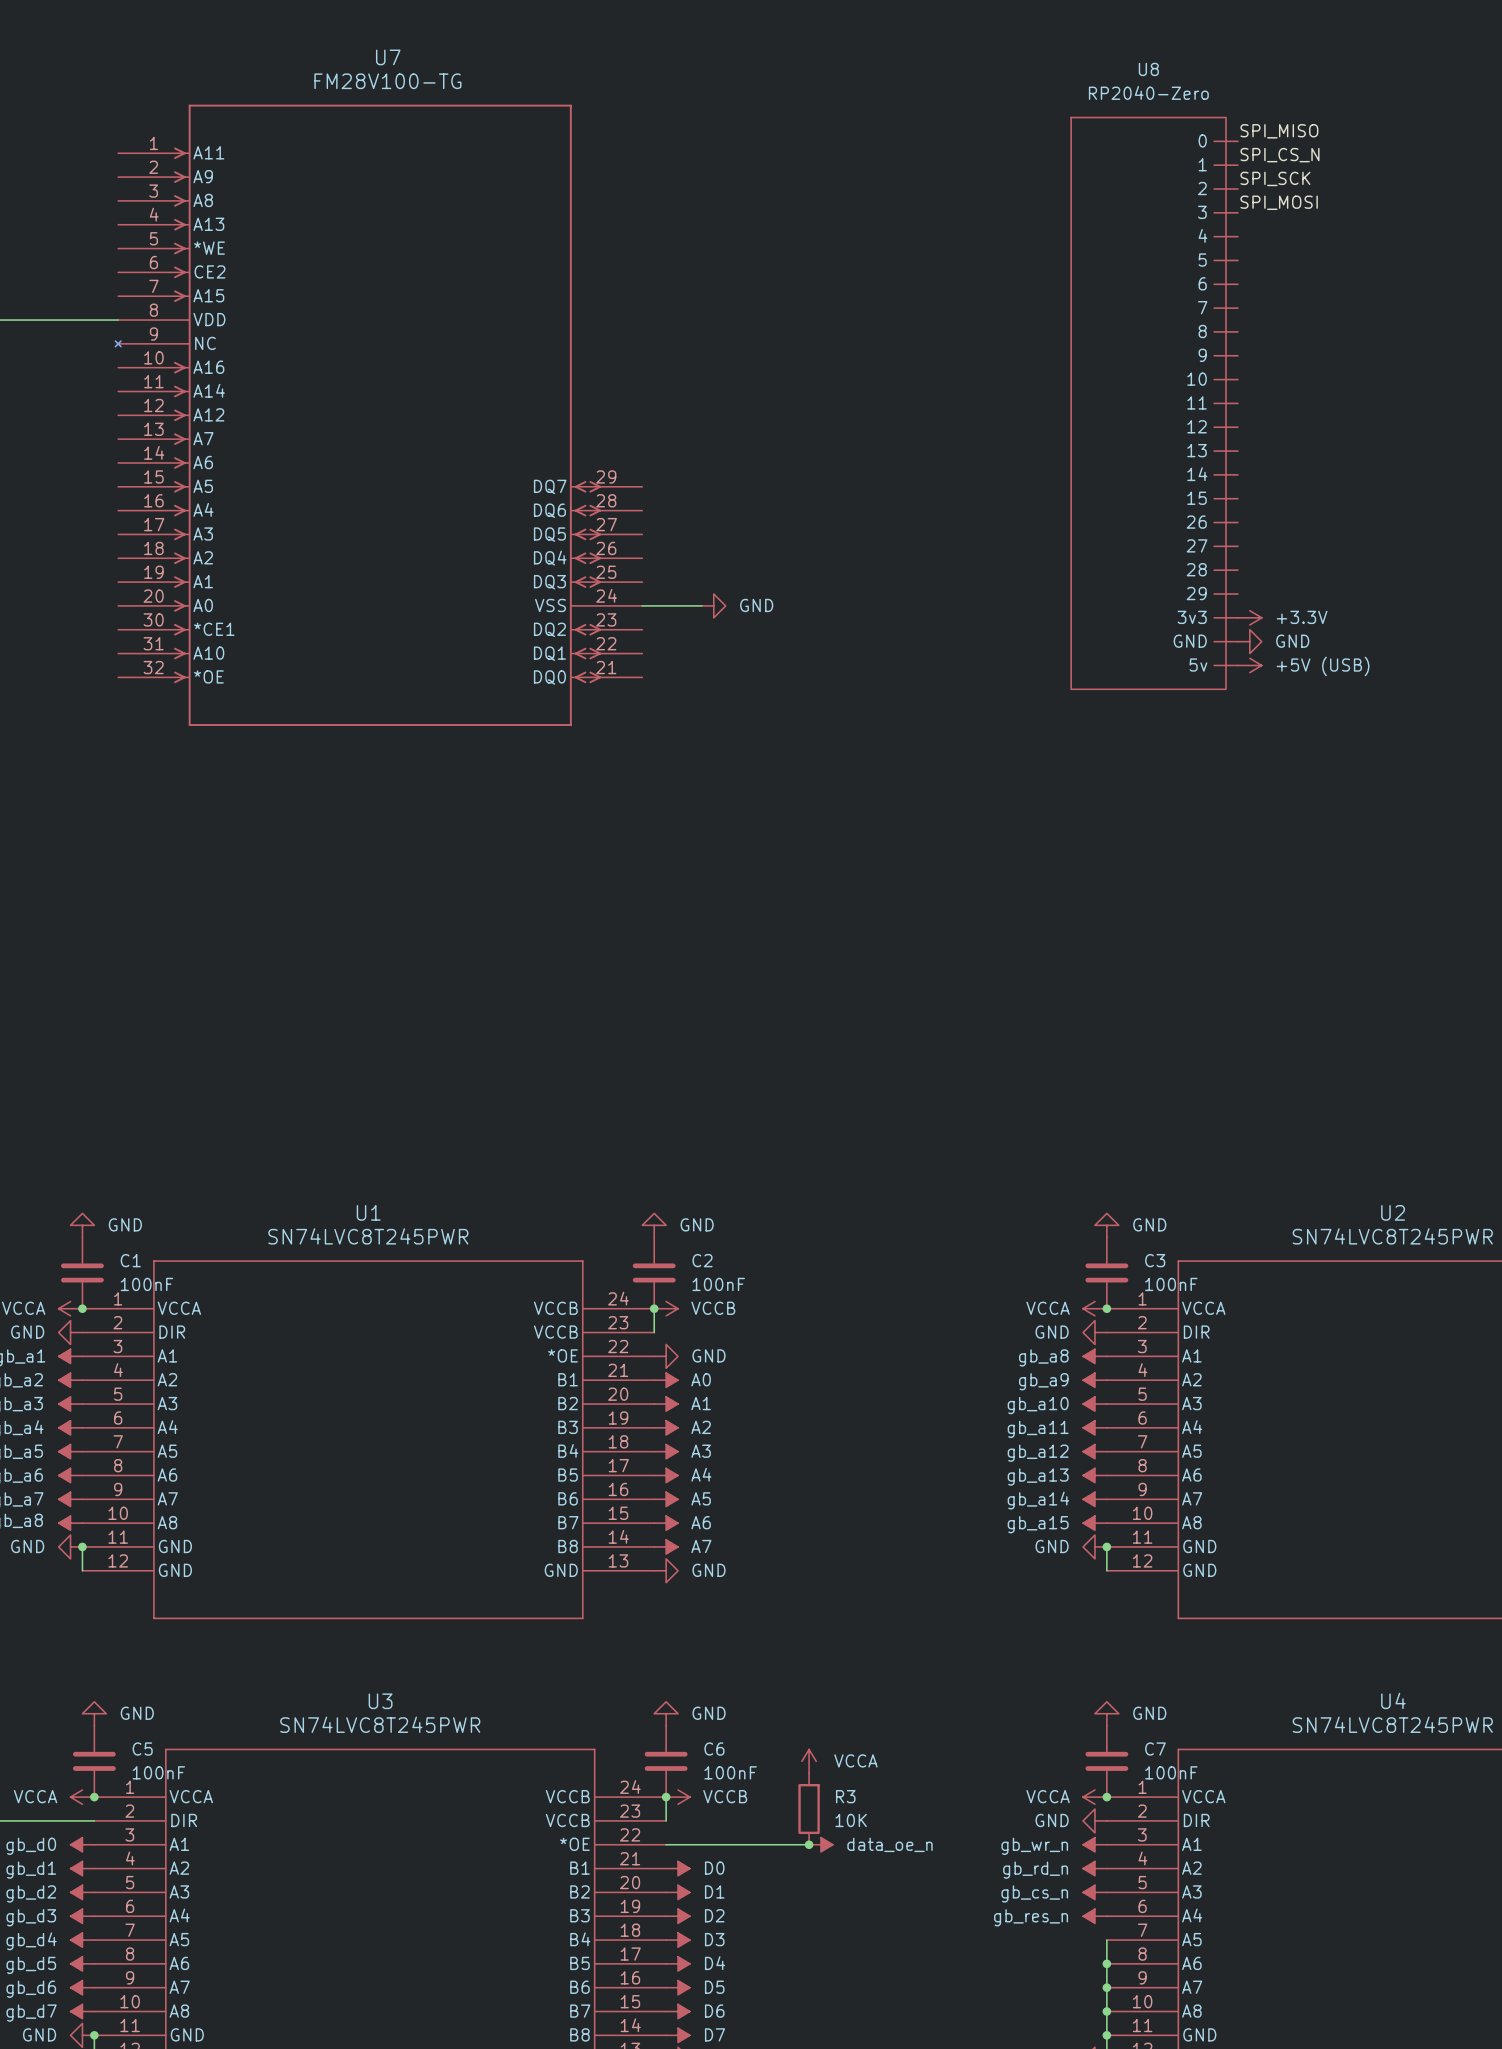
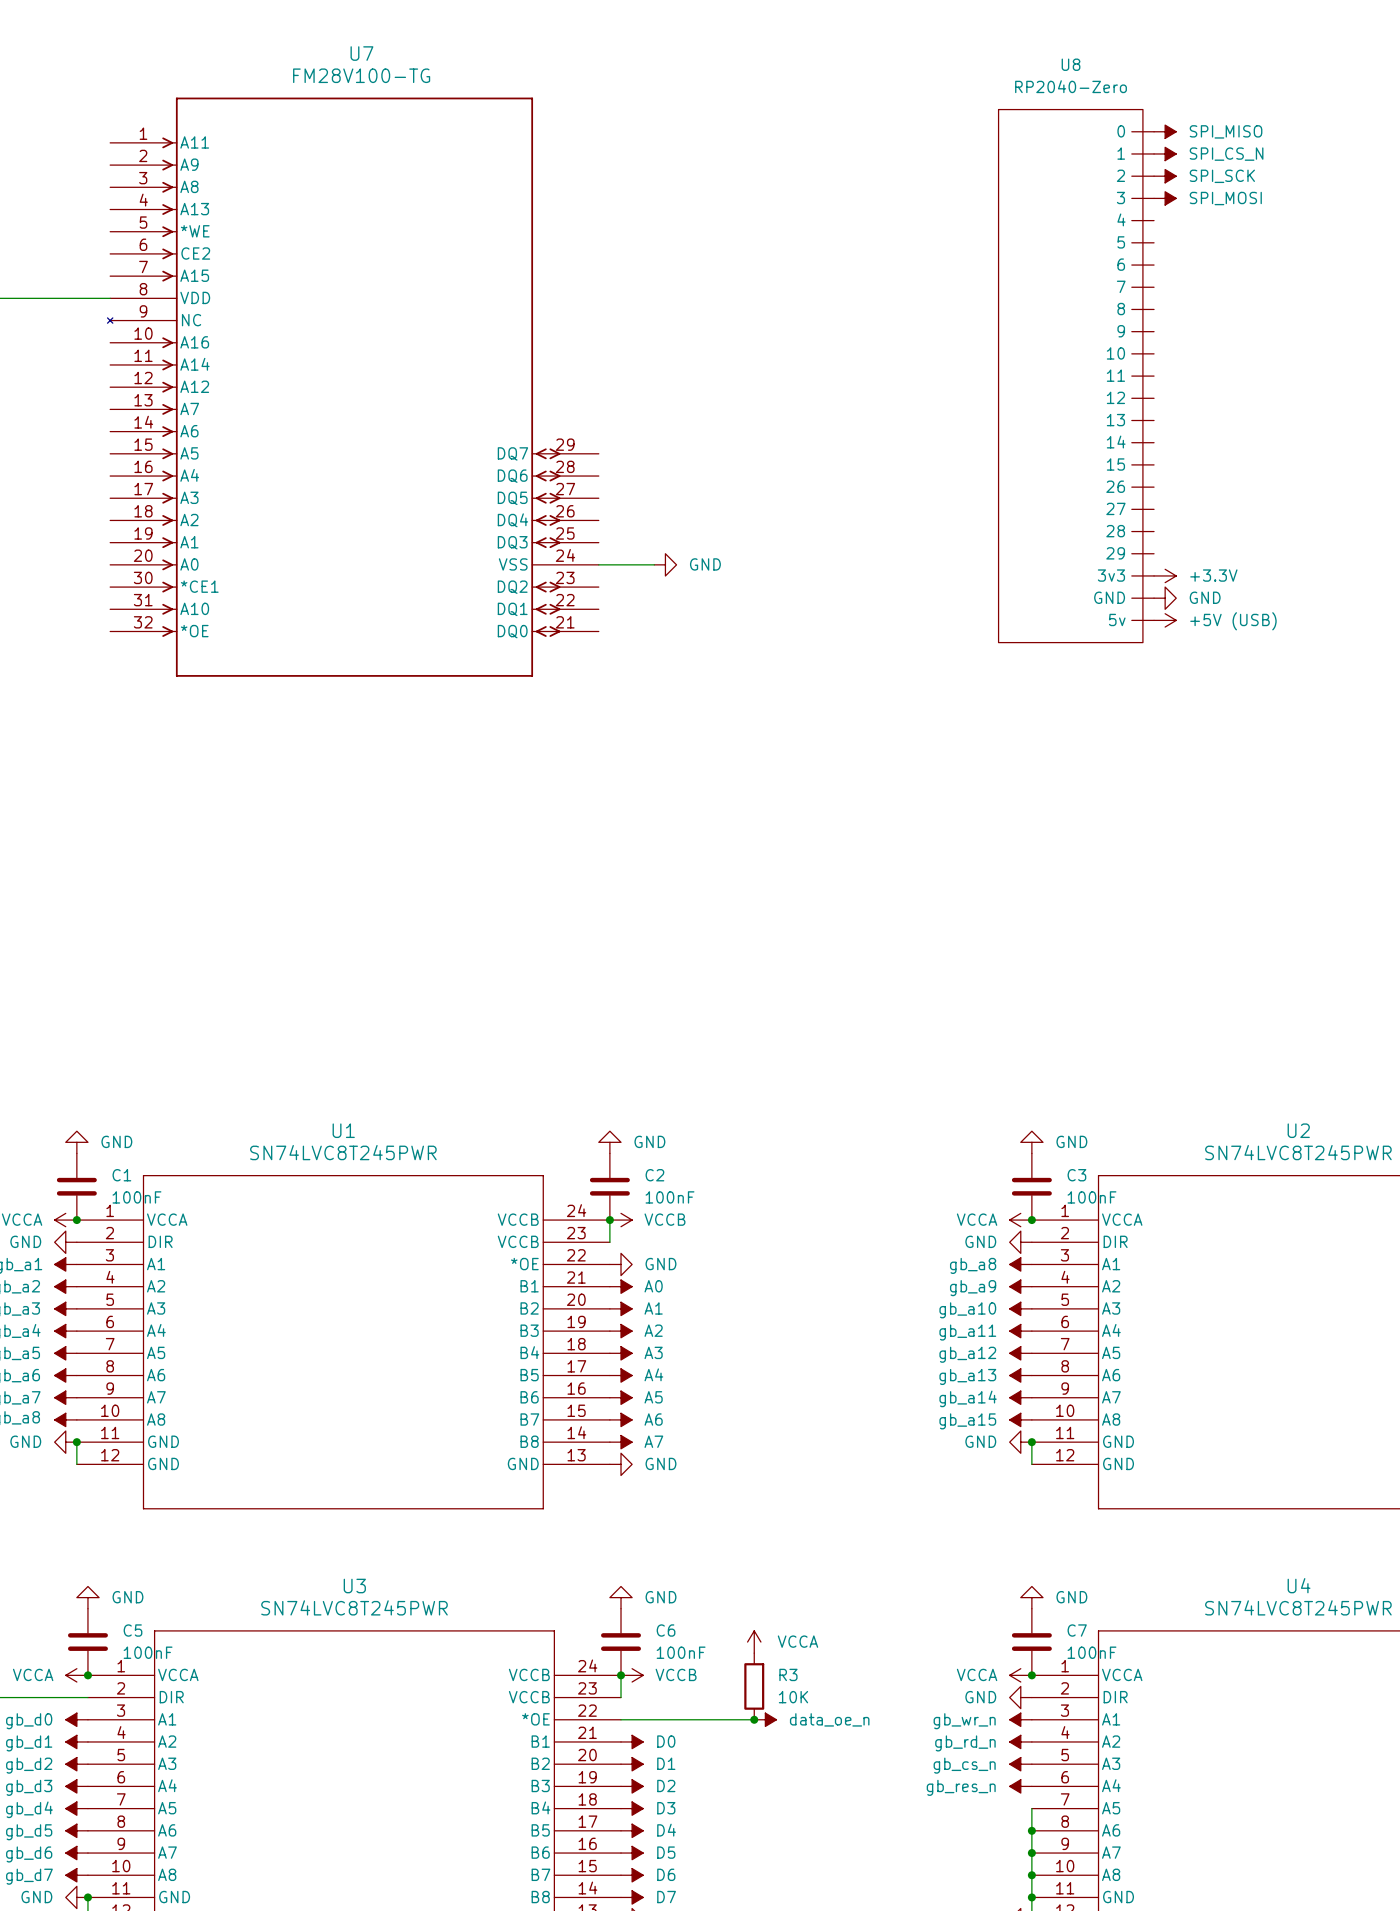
label: SPI_MISO (1279, 131) -> none
power symbol: none -> SPI_MISO (1165, 131)
label: SPI_CS_N (1279, 155) -> none
power symbol: none -> SPI_CS_N (1165, 153)
label: SPI_SCK (1275, 178) -> none
power symbol: none -> SPI_SCK (1165, 176)
label: SPI_MOSI (1279, 202) -> none
power symbol: none -> SPI_MOSI (1165, 198)

